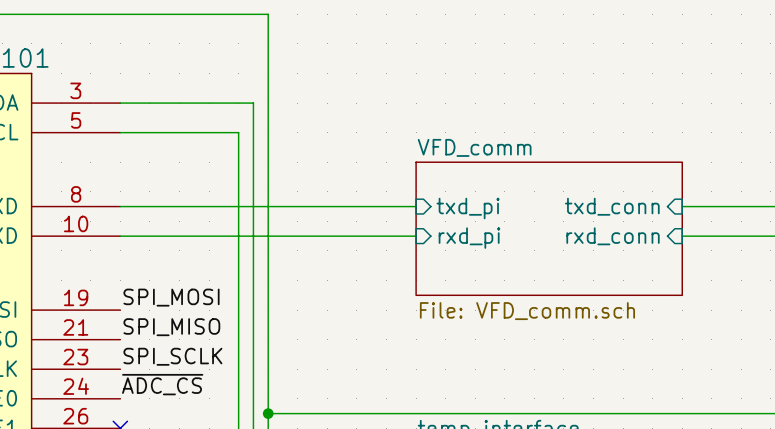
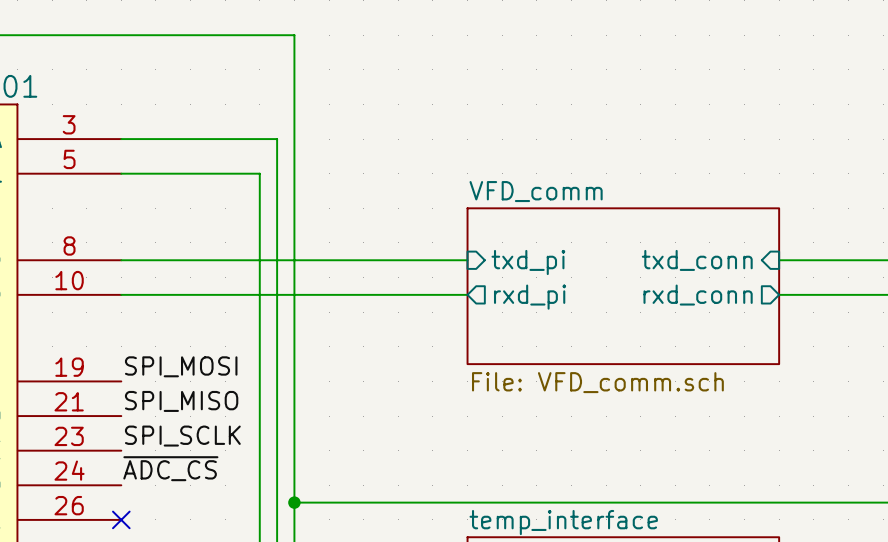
sheet pin shape: input (613, 236) -> output (698, 295)
sheet pin shape: input (469, 238) -> output (530, 297)

